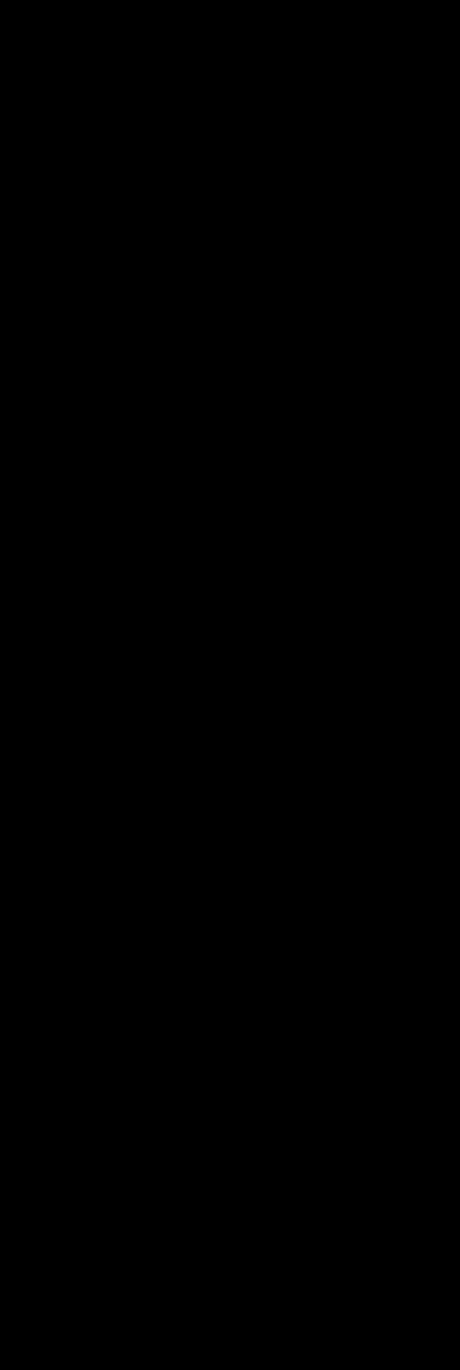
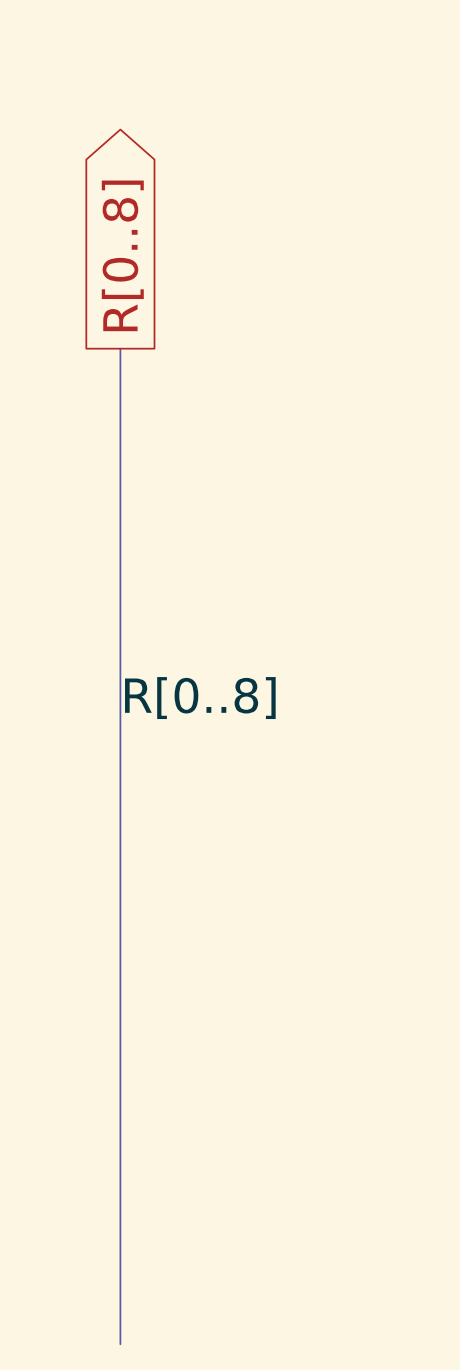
global label: none -> R[0..8] (122, 255)
bus: none -> (120, 348) (120, 1344)
label: none -> R[0..8] (200, 698)

